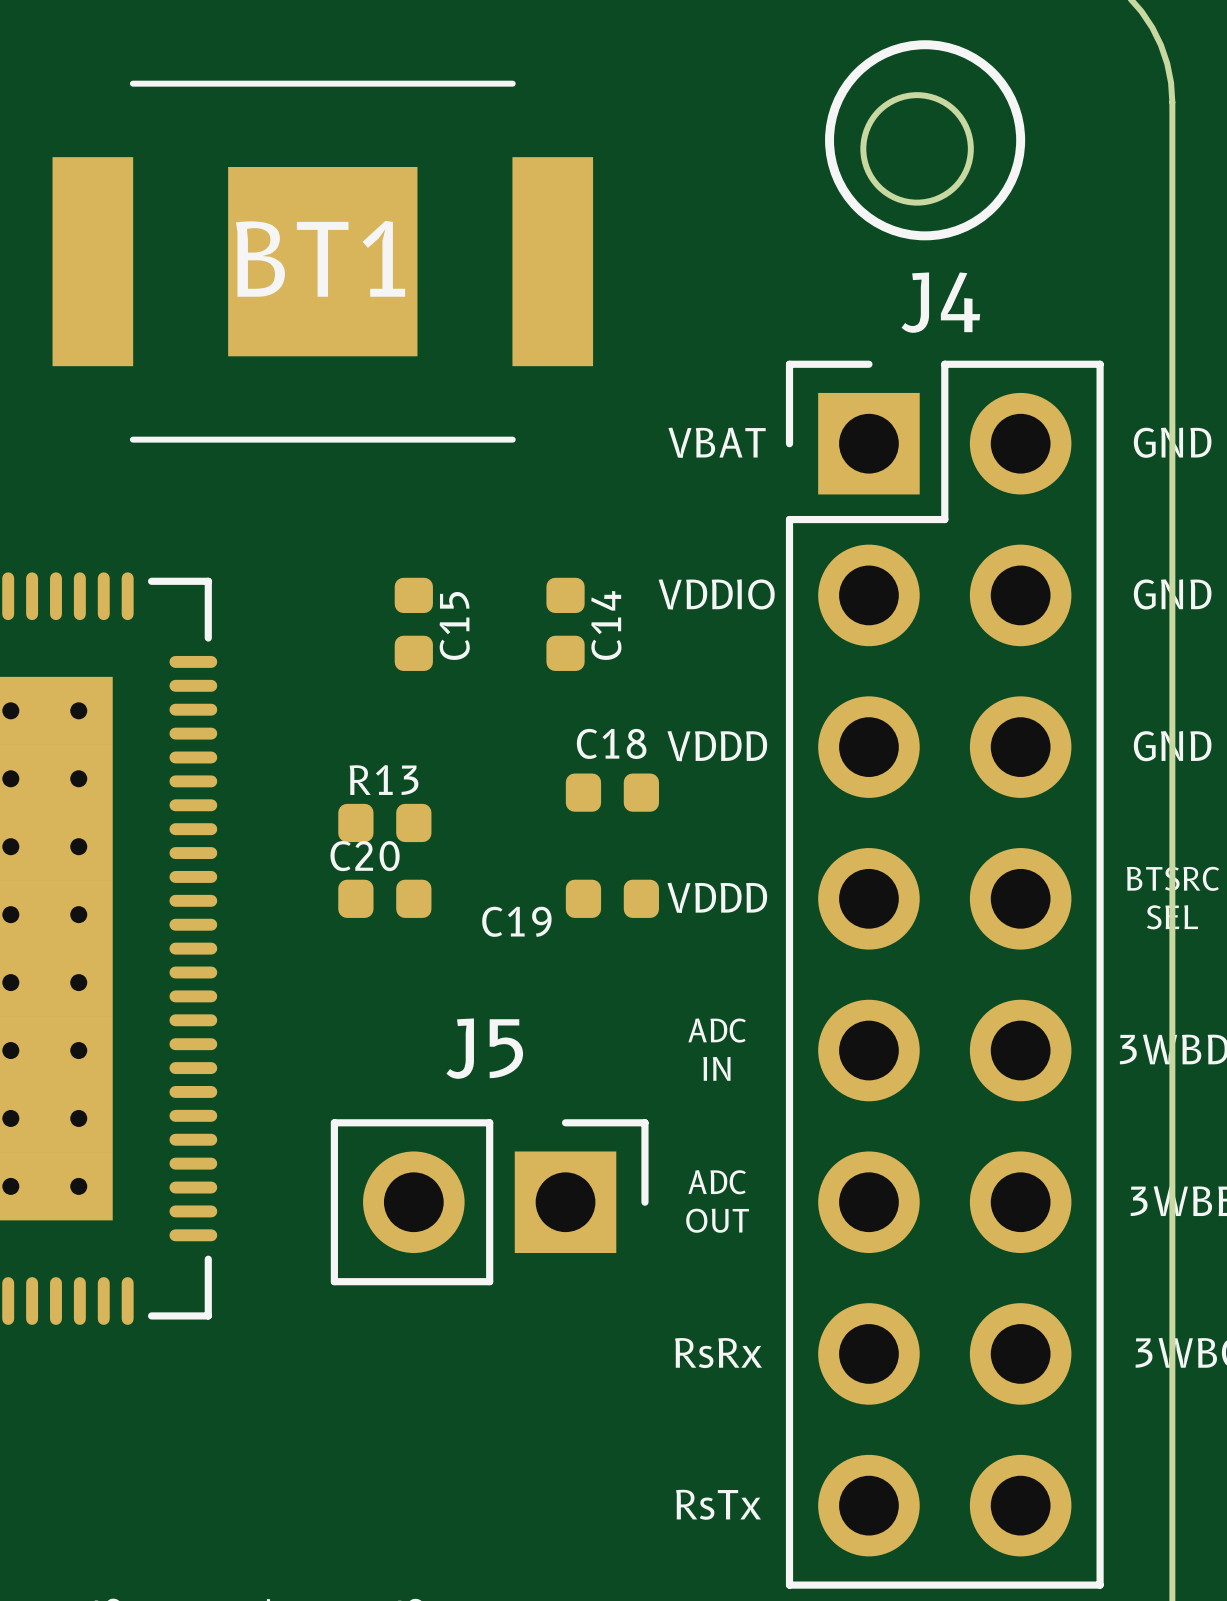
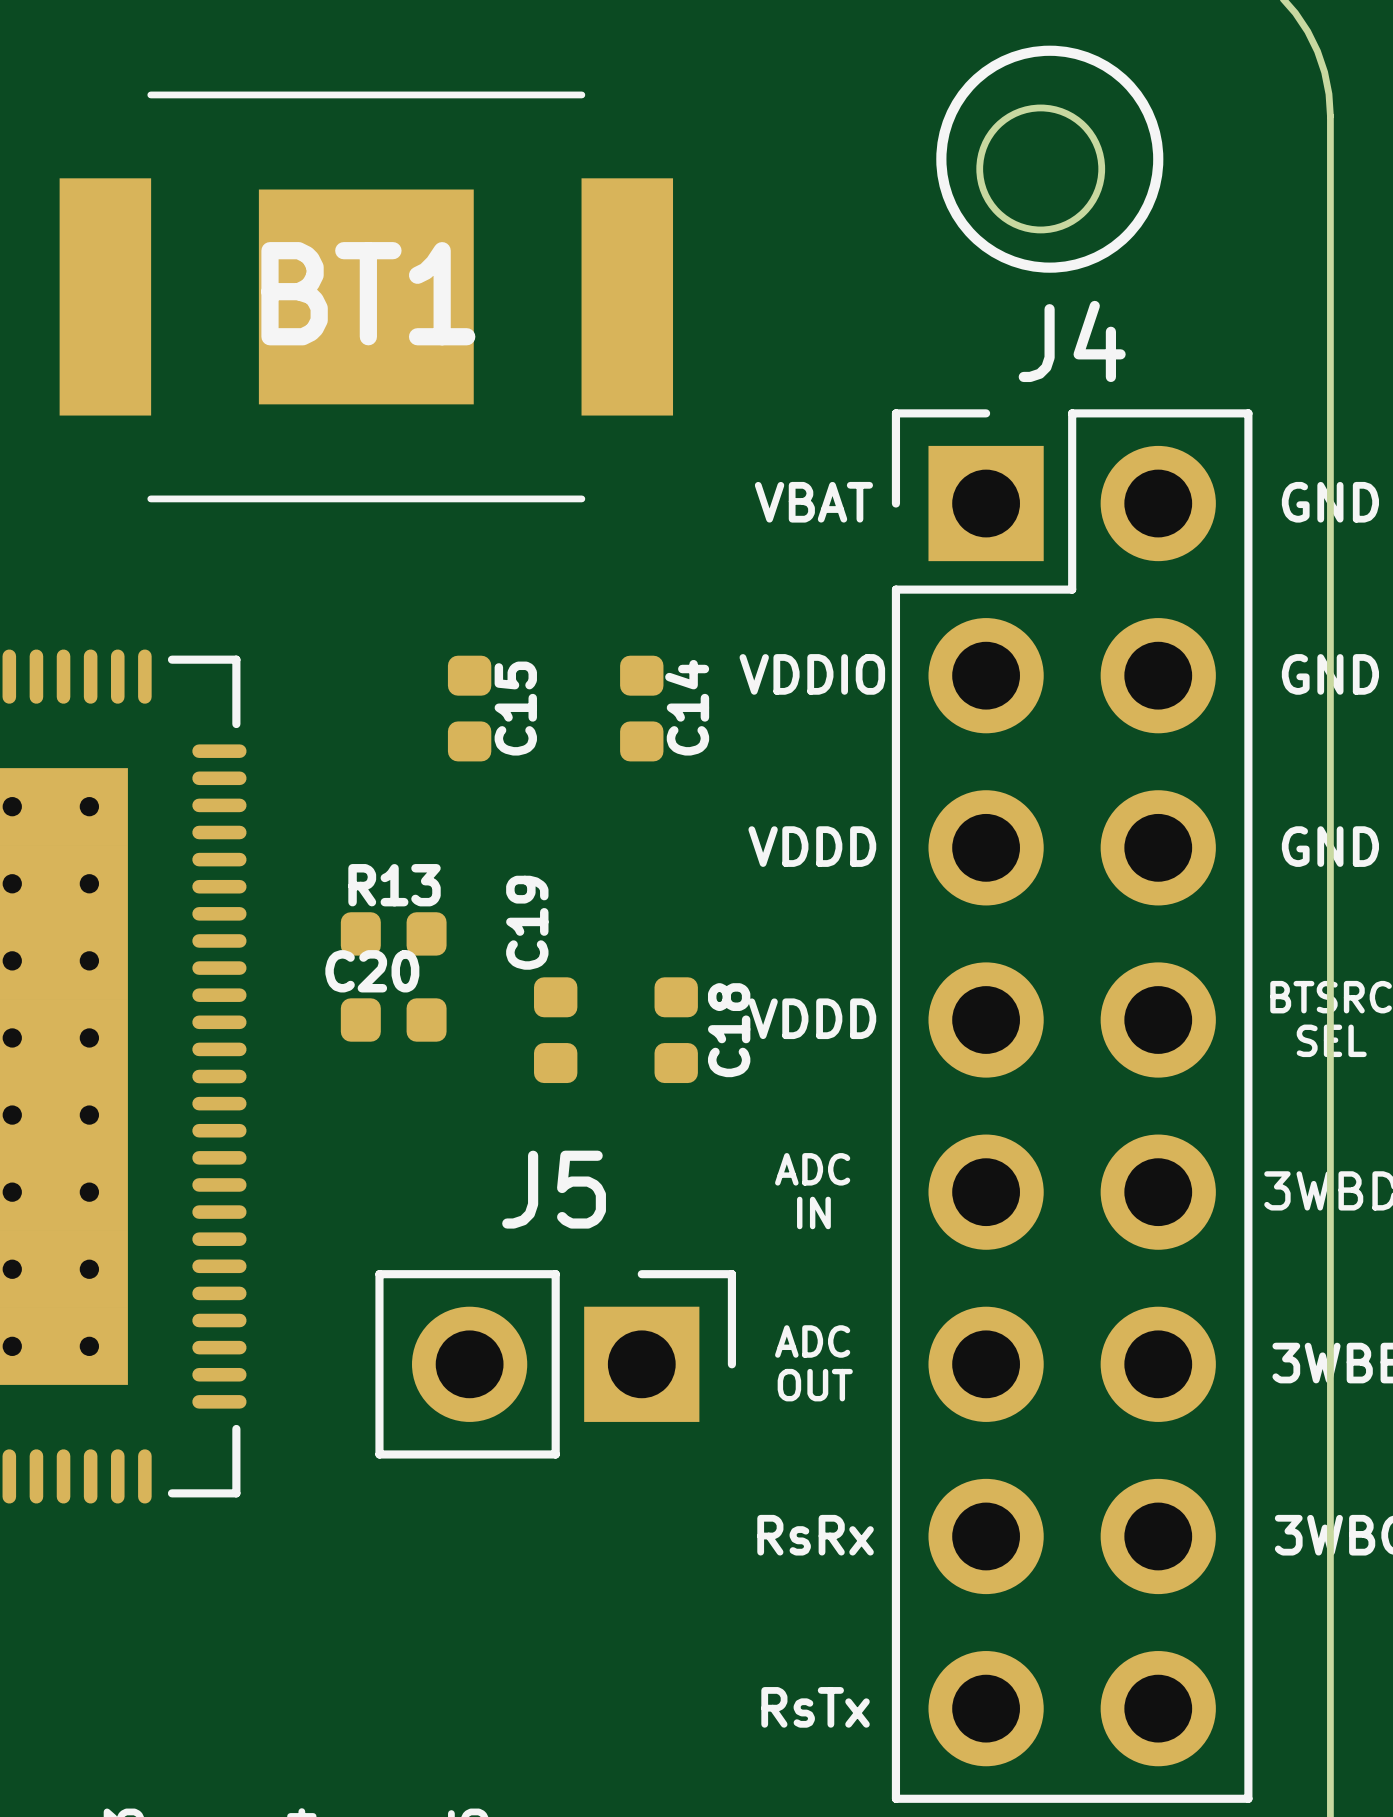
C18 rotation: 0° (612, 792) -> 90° clockwise (676, 1030)
C18 position: (612, 792) -> (676, 1030)
R13 position: (384, 822) -> (393, 933)
C20 position: (384, 898) -> (393, 1020)
C19 rotation: 0° (612, 898) -> 90° clockwise (555, 1030)
C19 position: (612, 898) -> (555, 1030)

